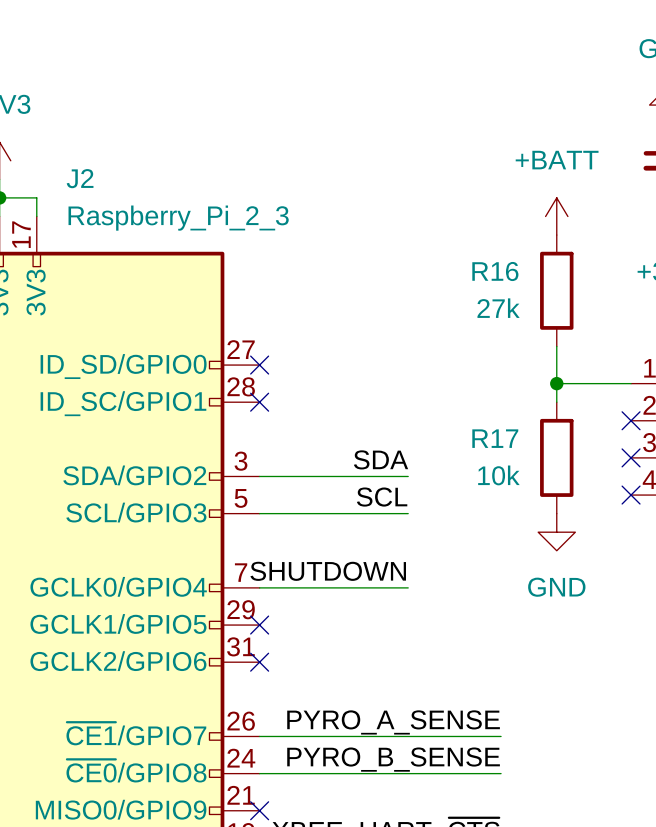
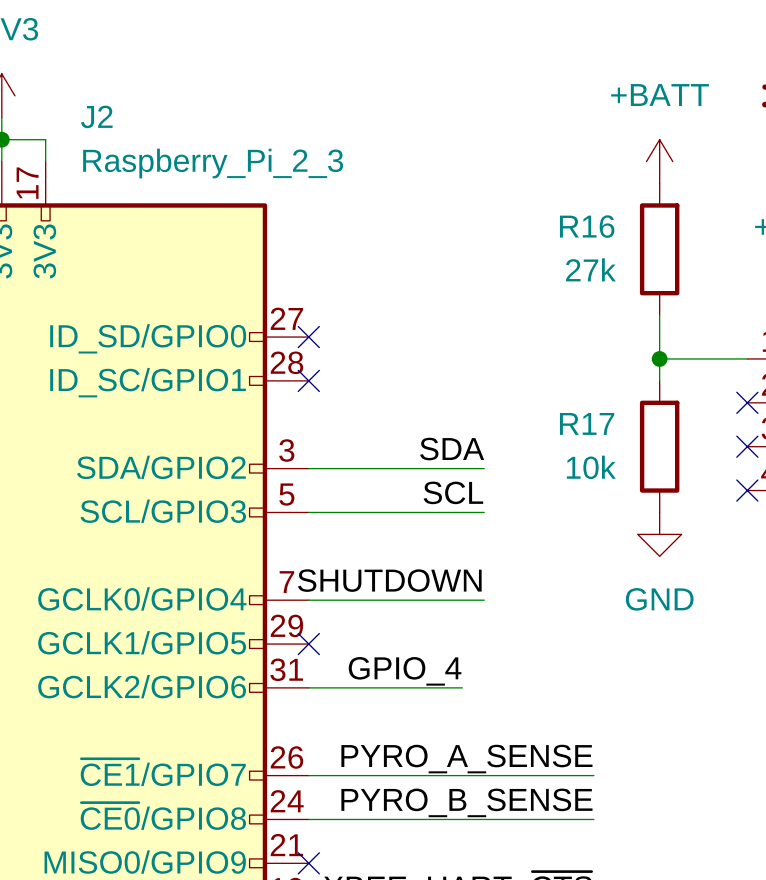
label: none -> GPIO_4 (405, 671)
wire: none -> (308, 687) (462, 687)
no-connect mark: (259, 662) -> none

